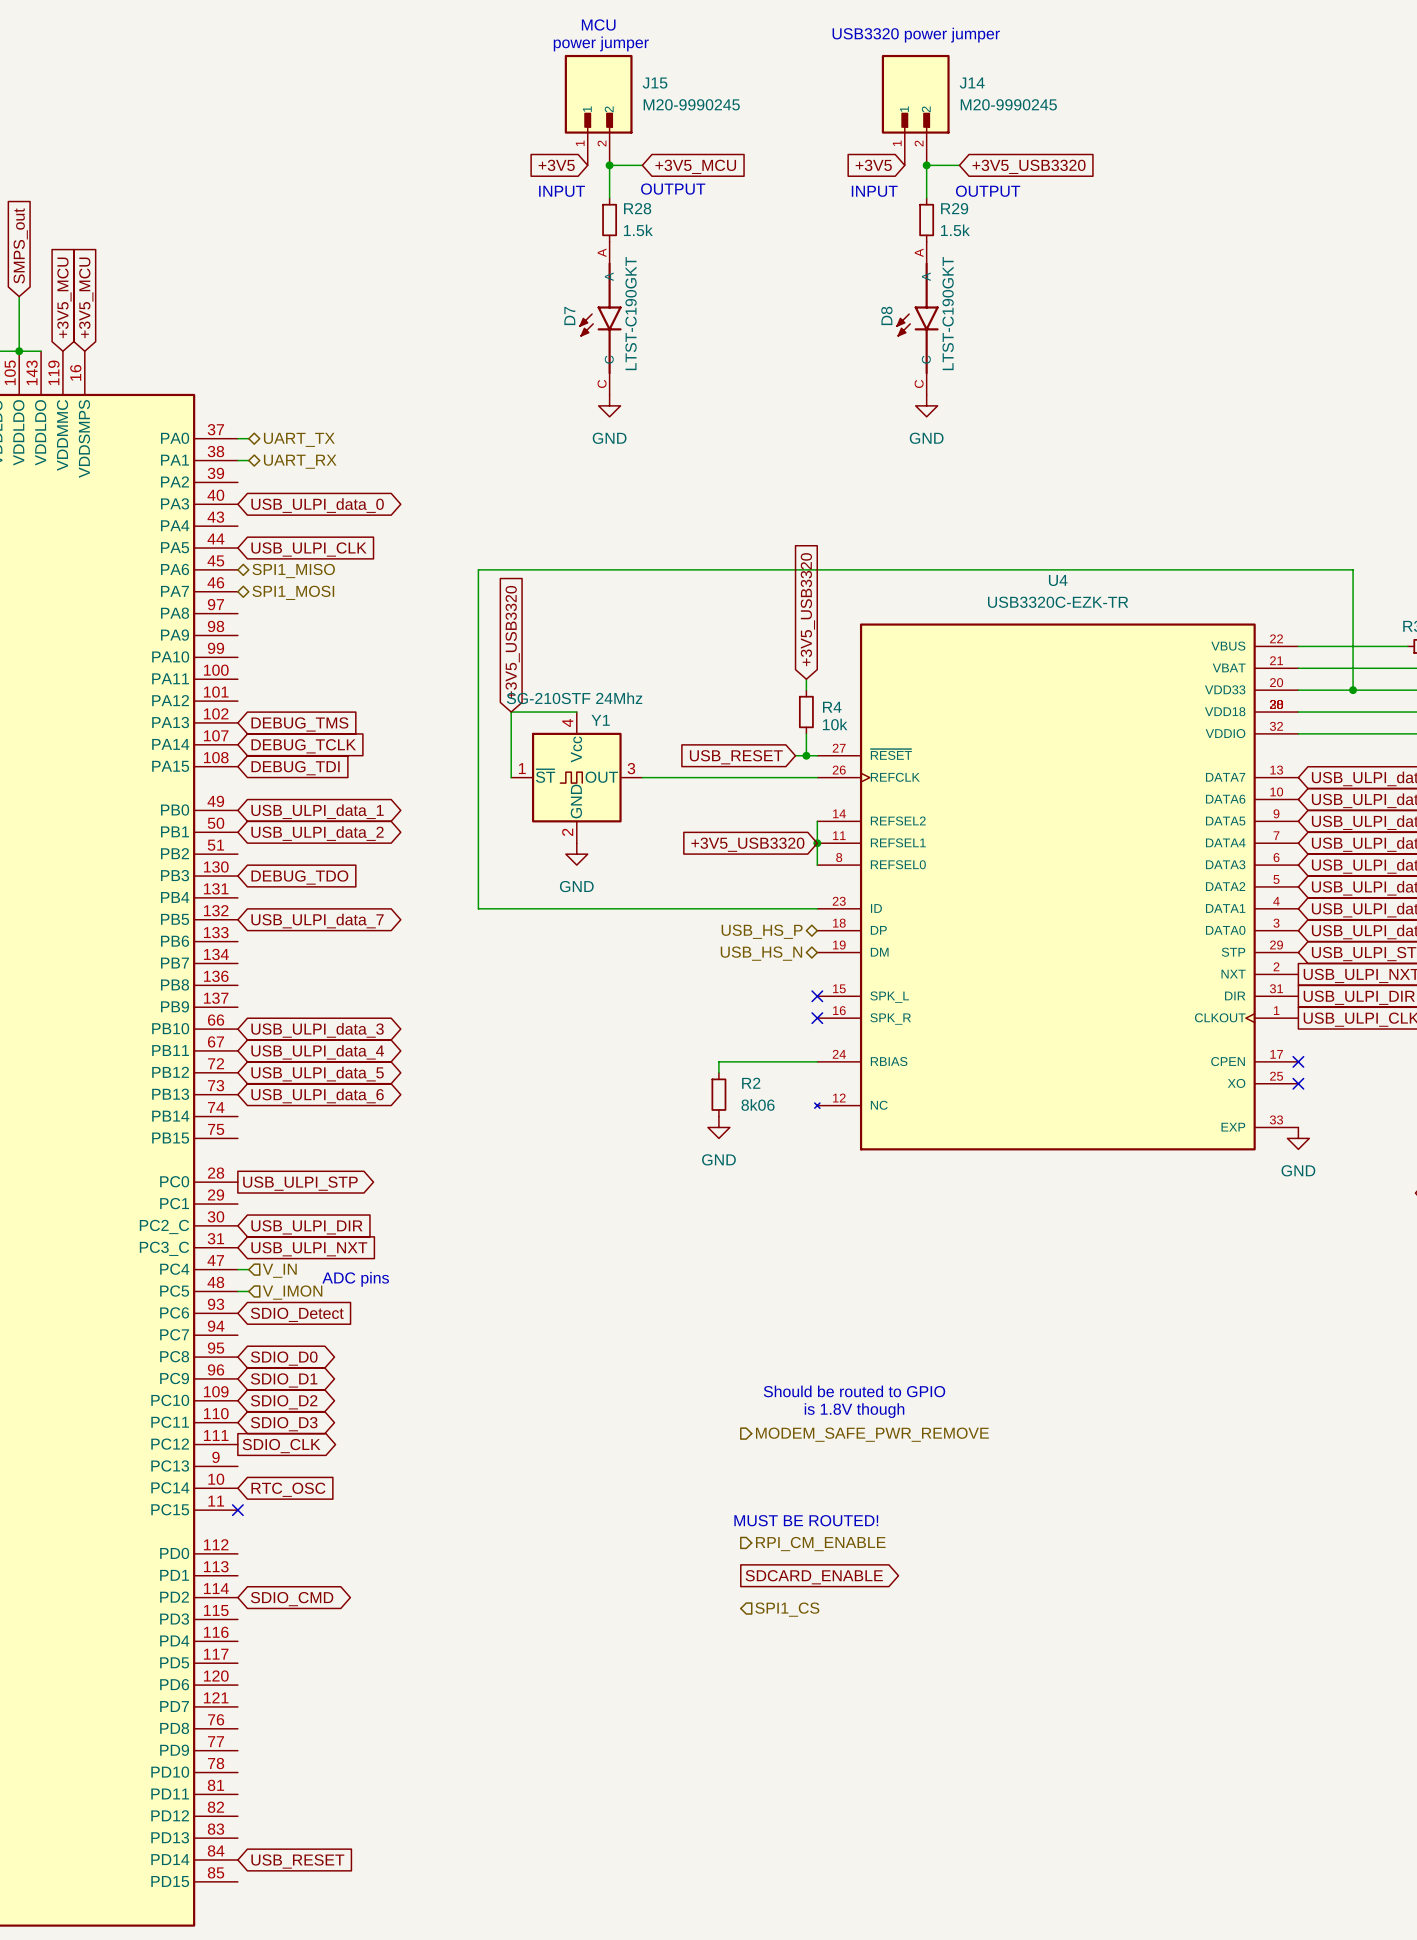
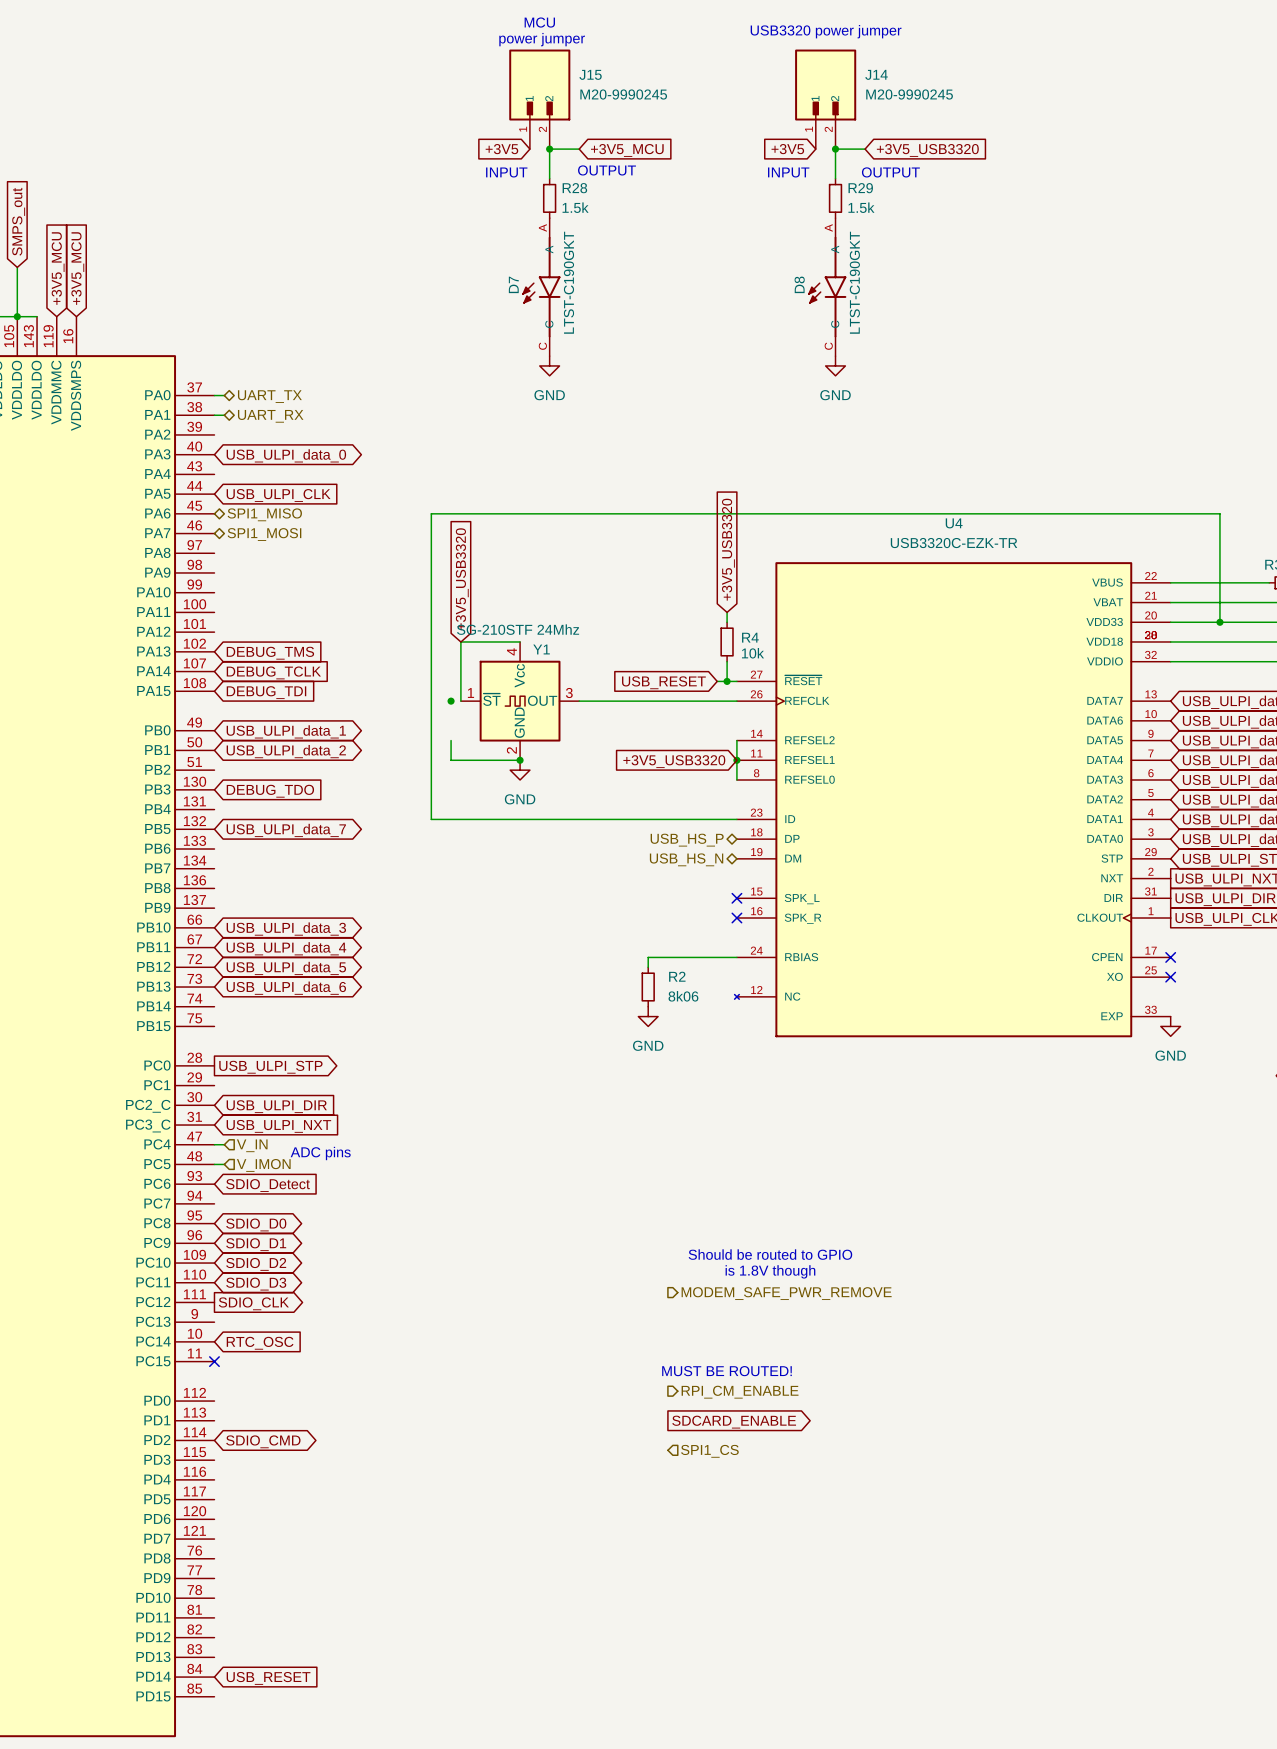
junction: none -> (451, 701)
wire: none -> (451, 740) (451, 760) (520, 760)
junction: none -> (520, 760)

